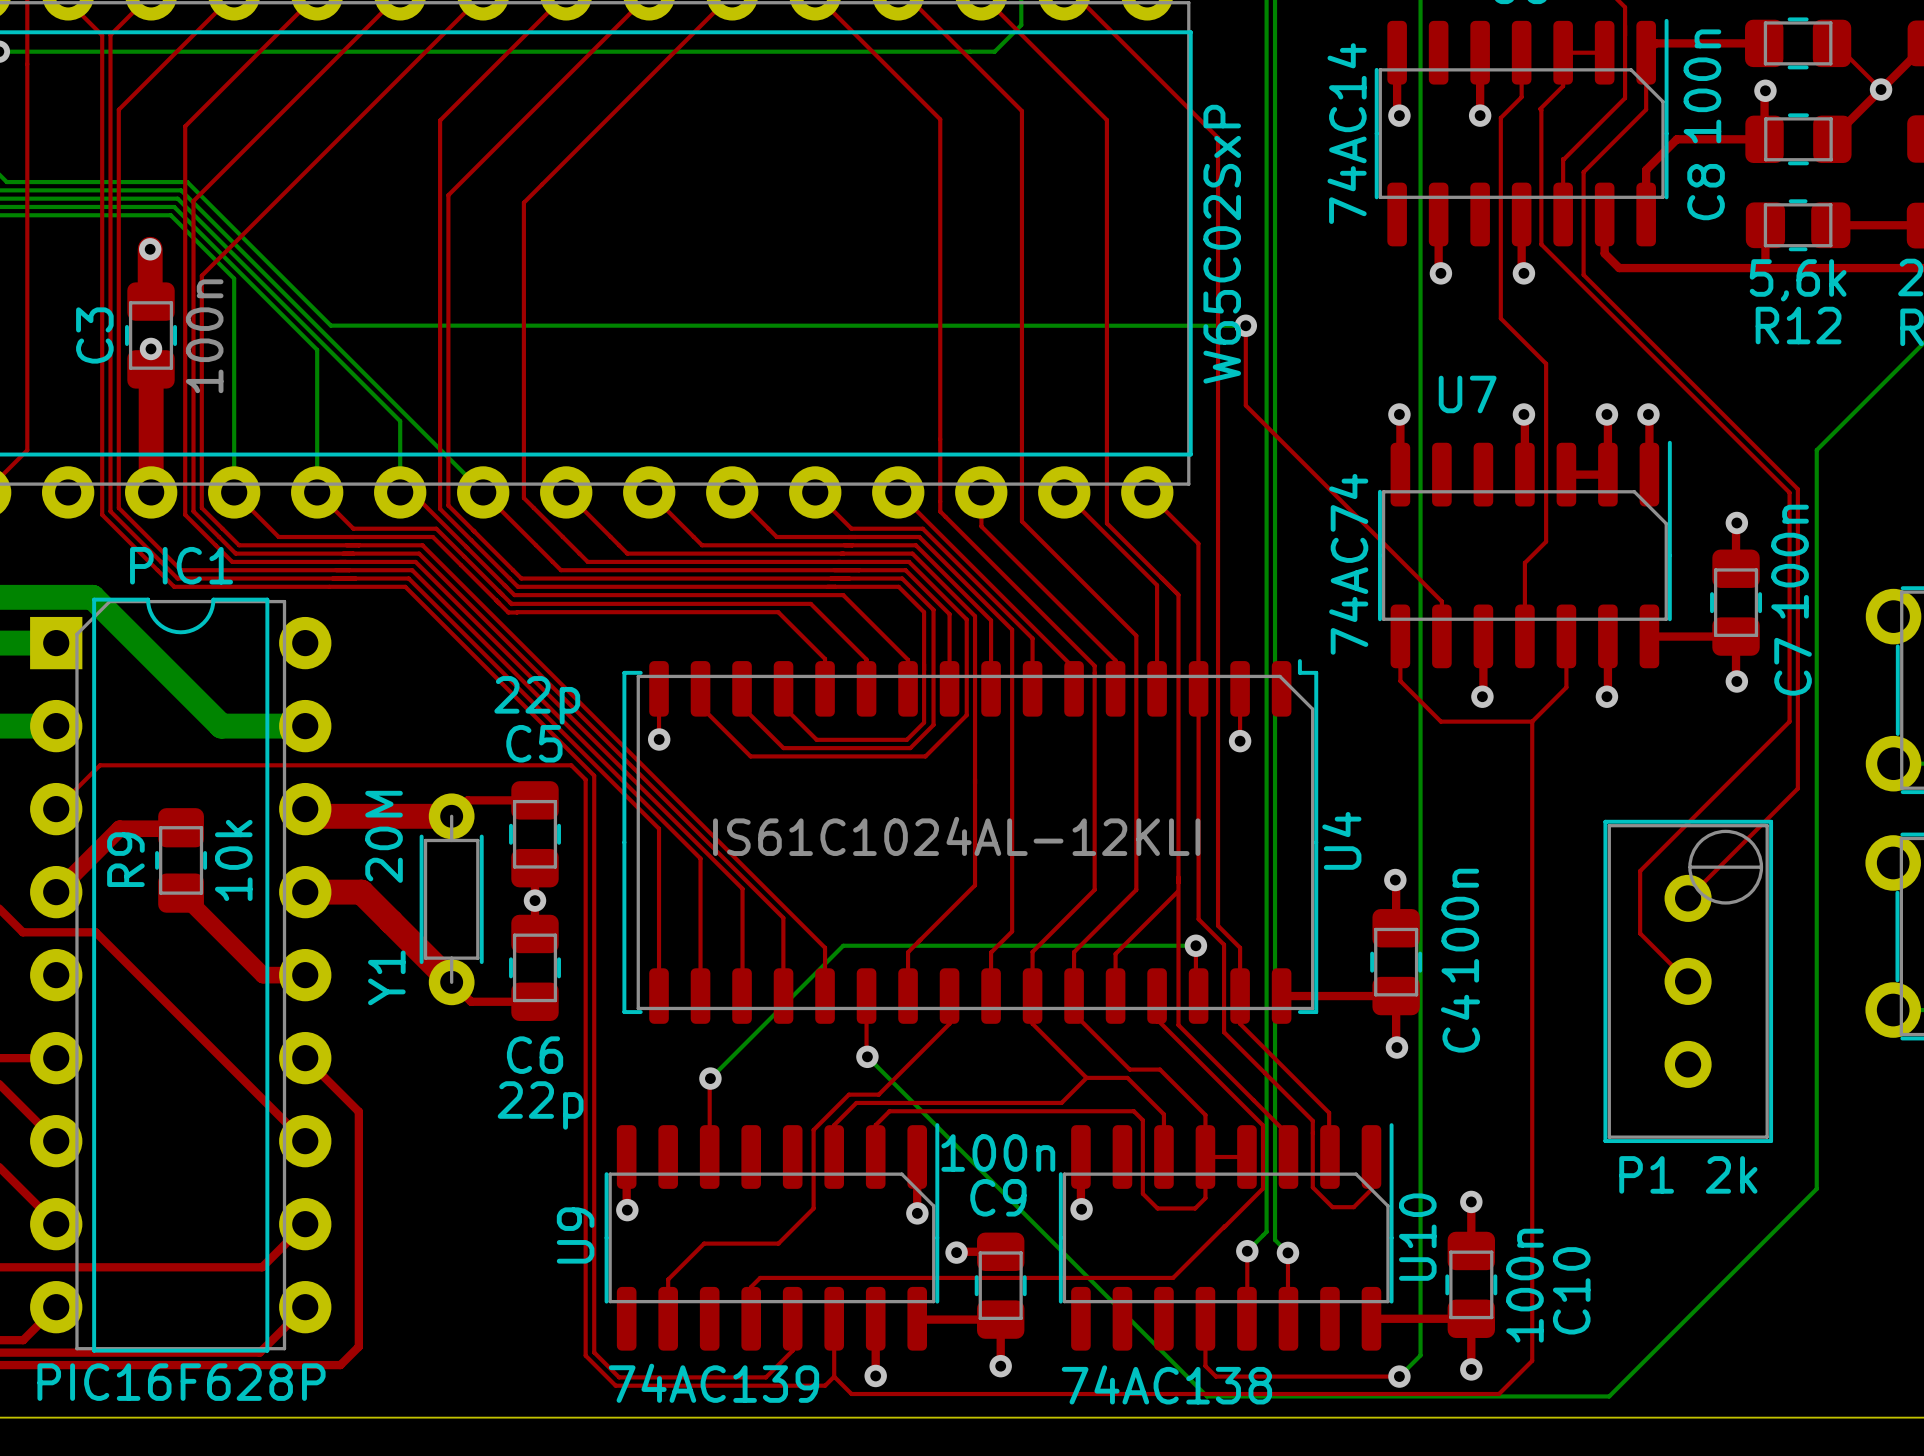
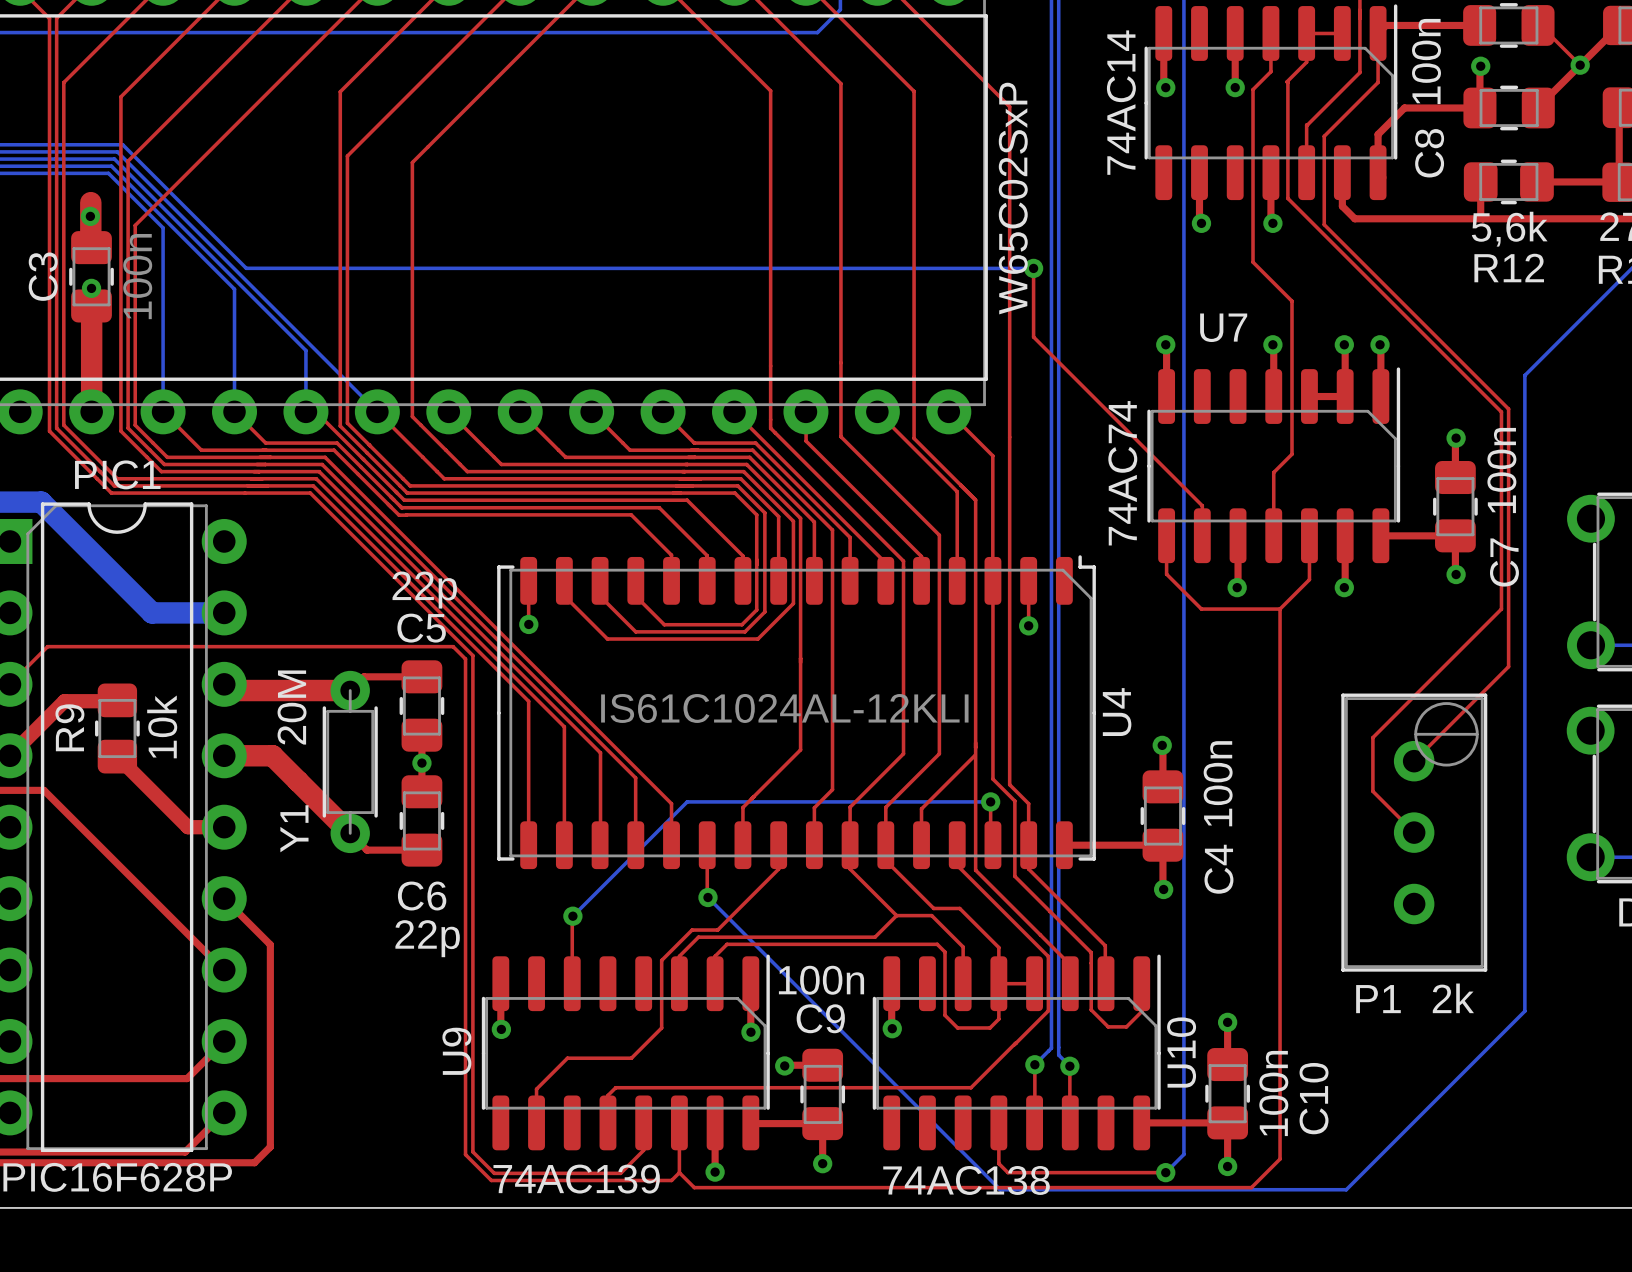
via position: (150, 249) -> (90, 216)

